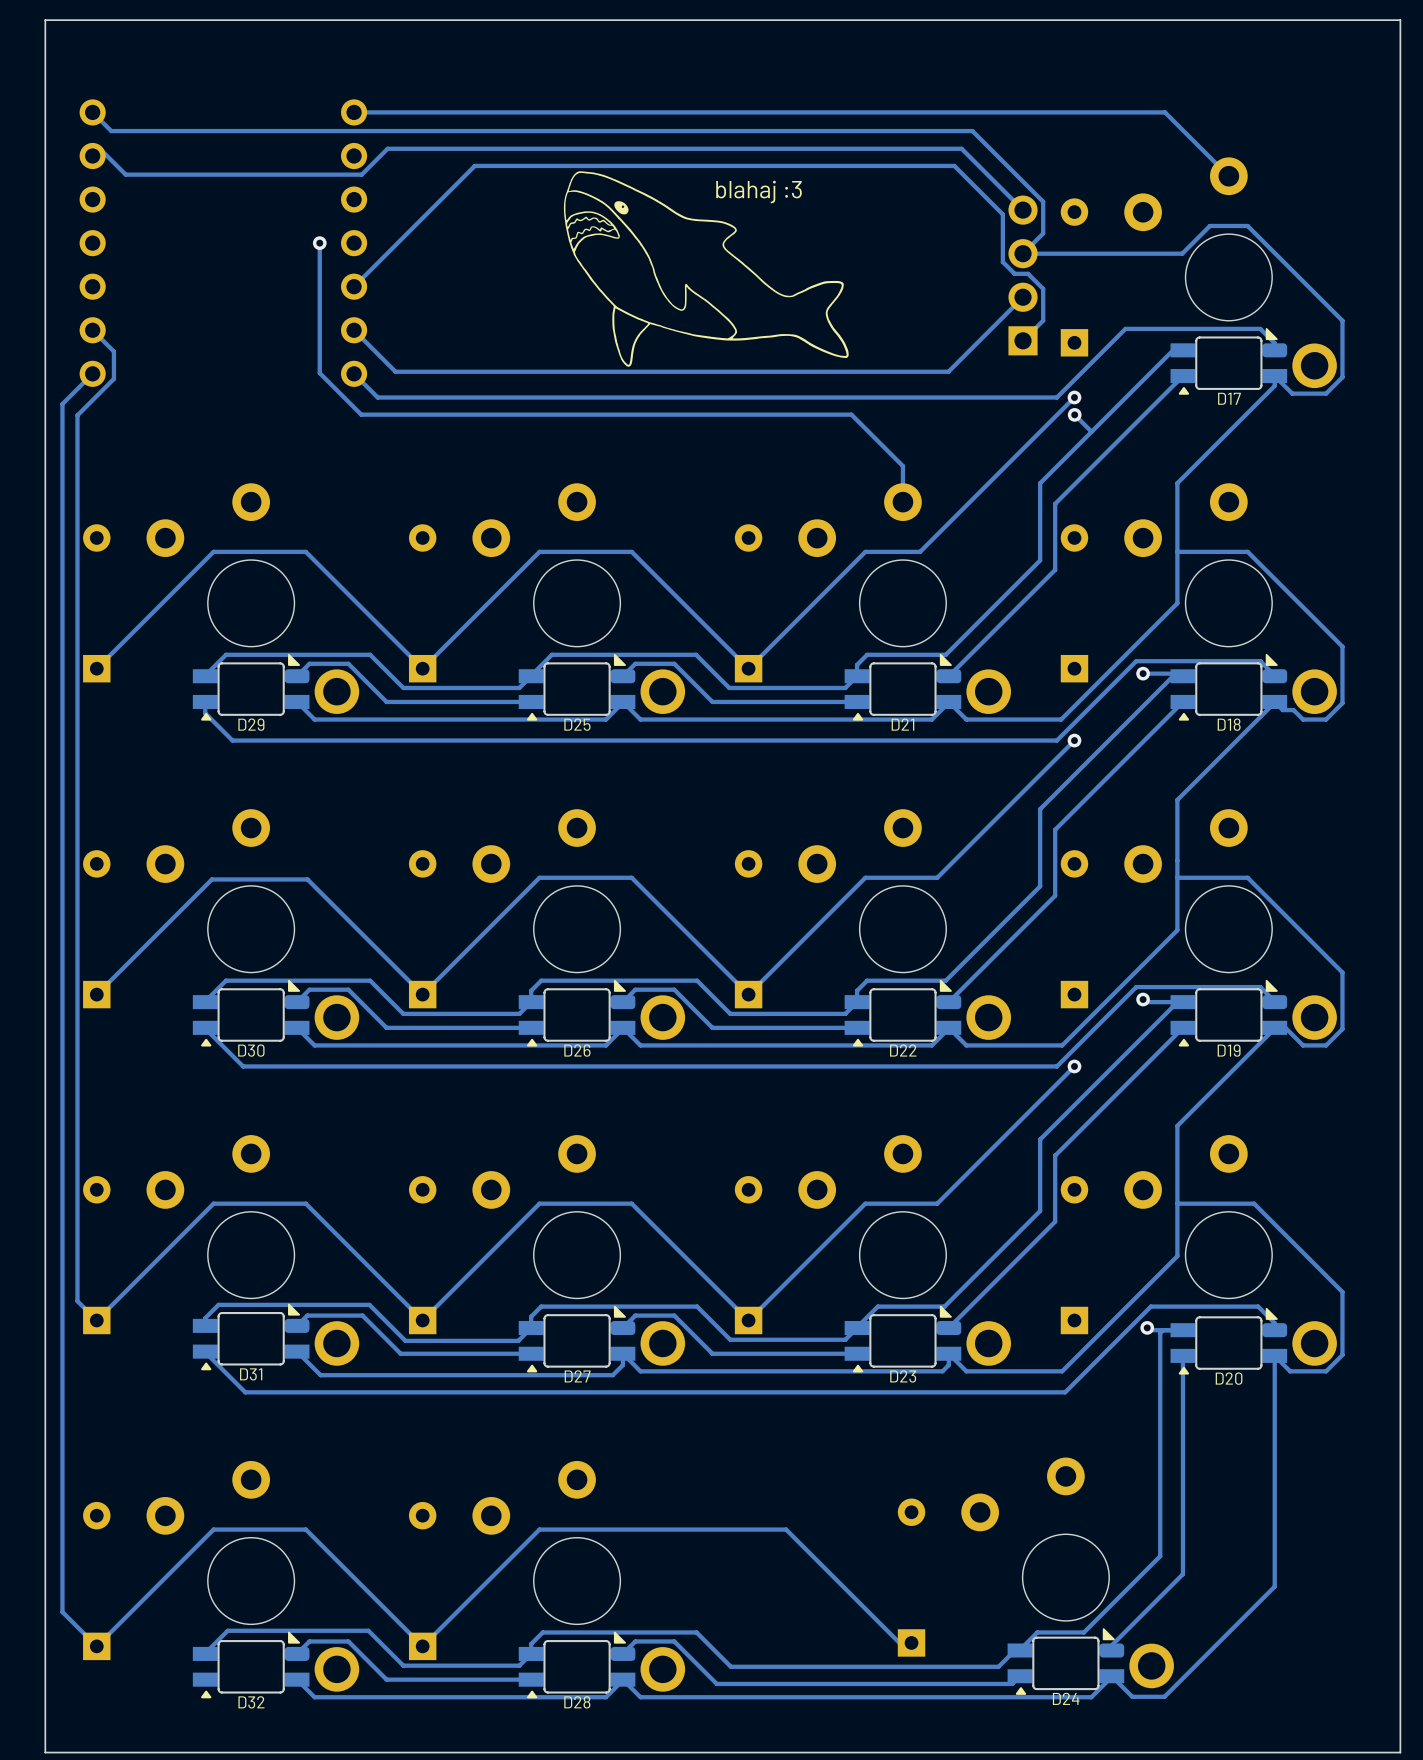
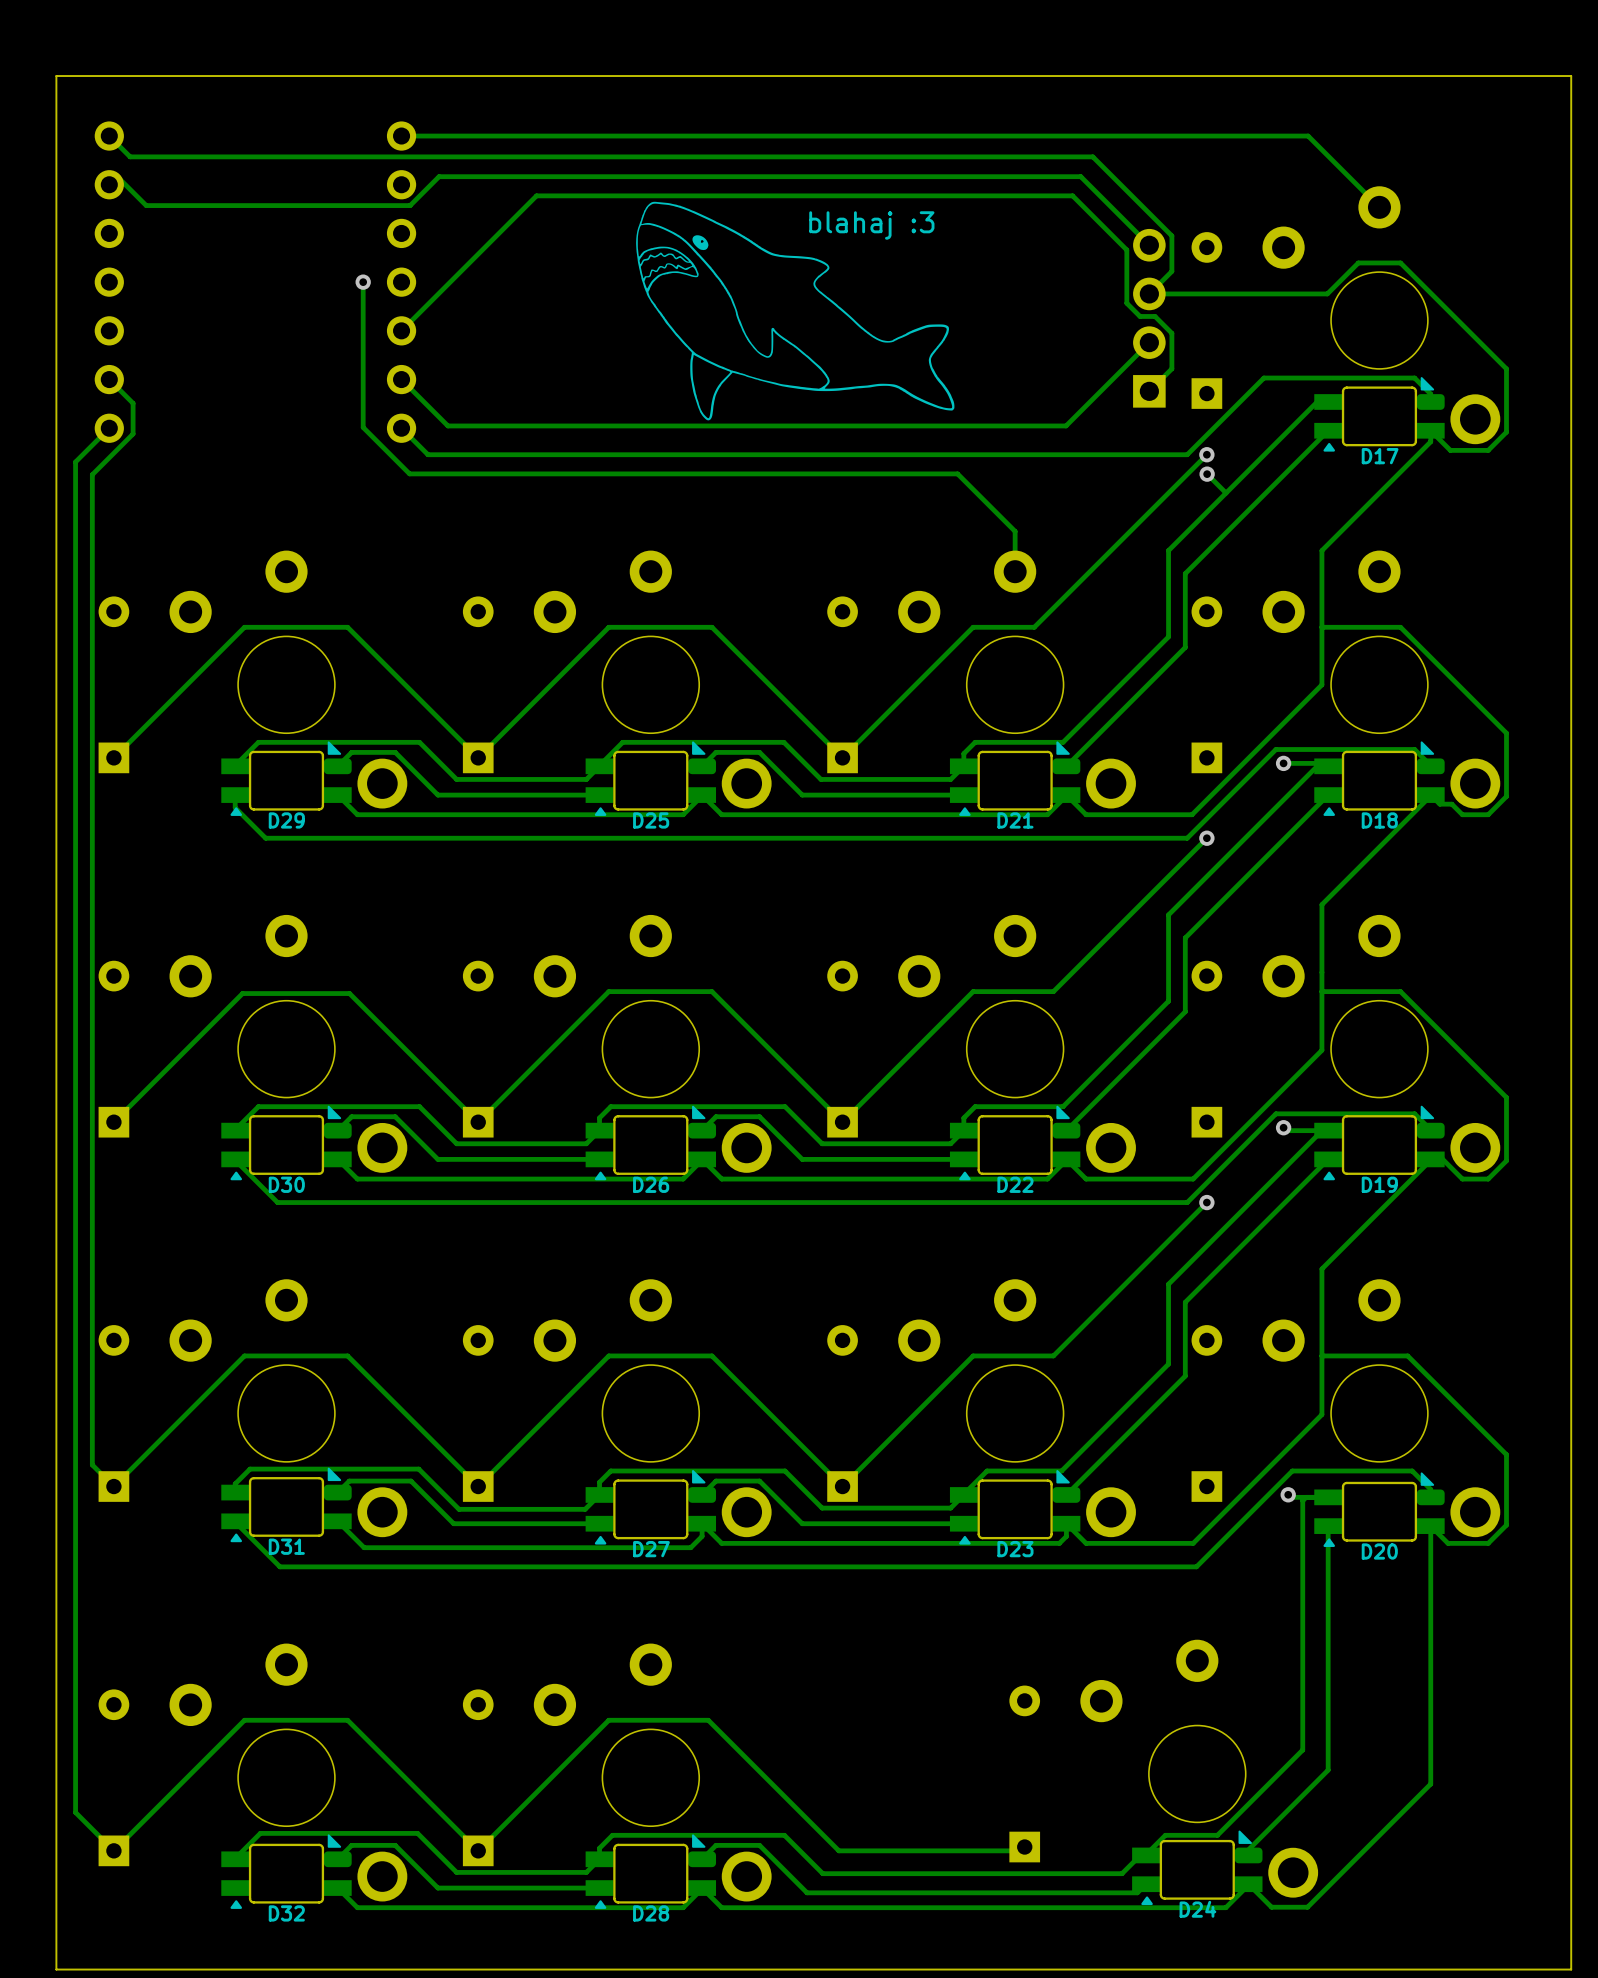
board edge: (1400, 58) (1400, 20) (45, 20) (45, 58) -> (1571, 76) (56, 76)
track: (628, 1529) (786, 1529) (902, 1646) -> (708, 1720) (838, 1850) (1015, 1850)

